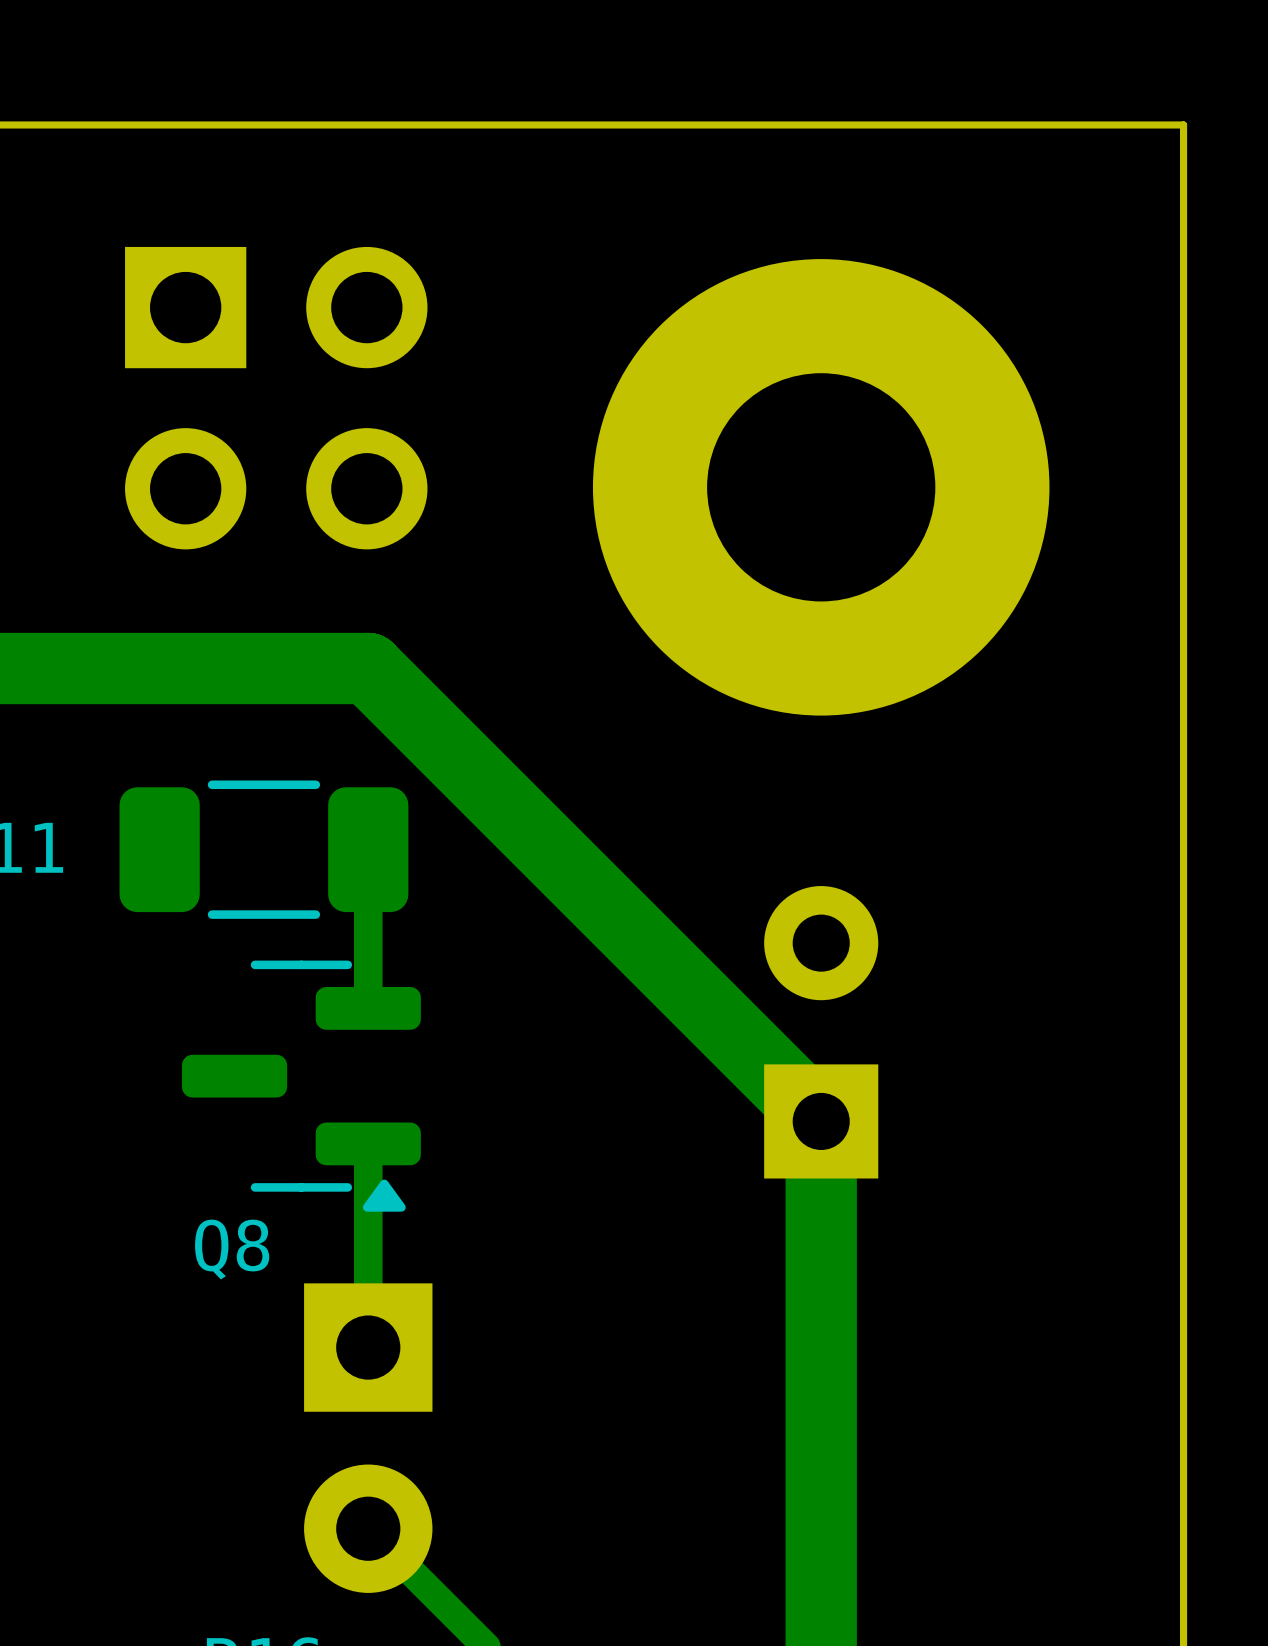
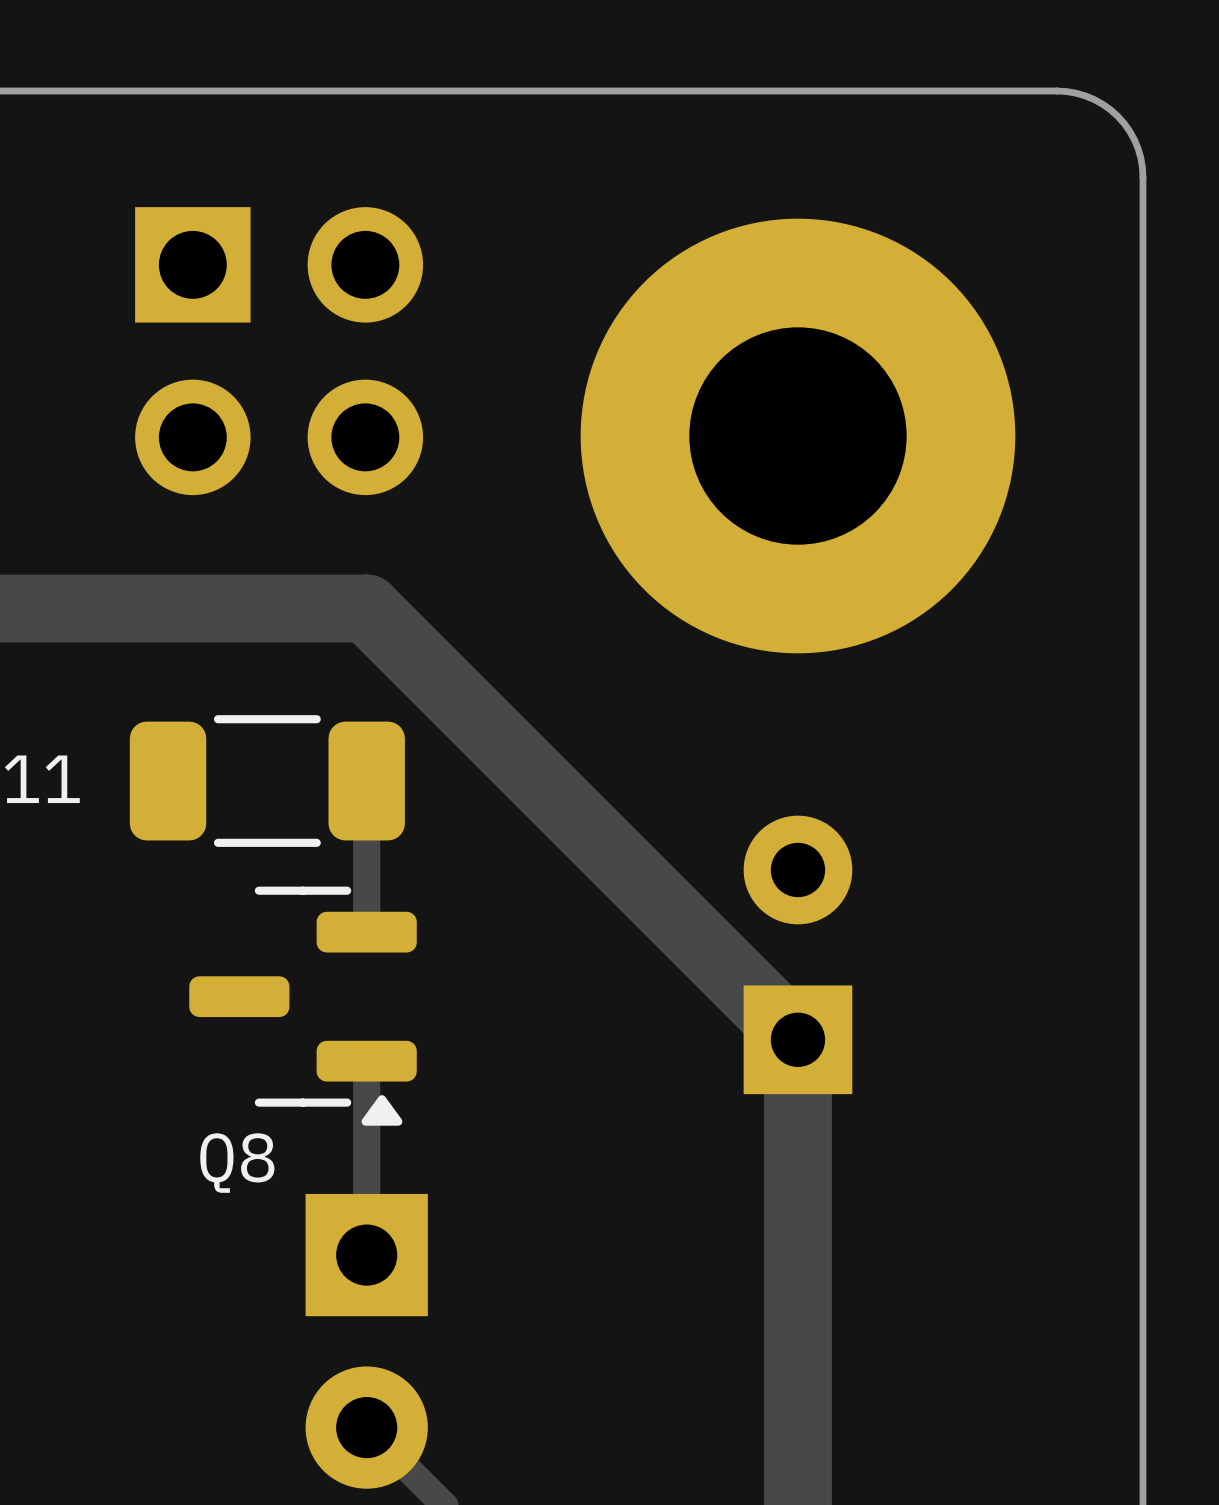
board edge: (1092, 124) (1183, 124) (1183, 215) -> (1056, 90) (1075, 93) (1094, 99) (1117, 116) (1134, 139) (1140, 158) (1142, 177)

